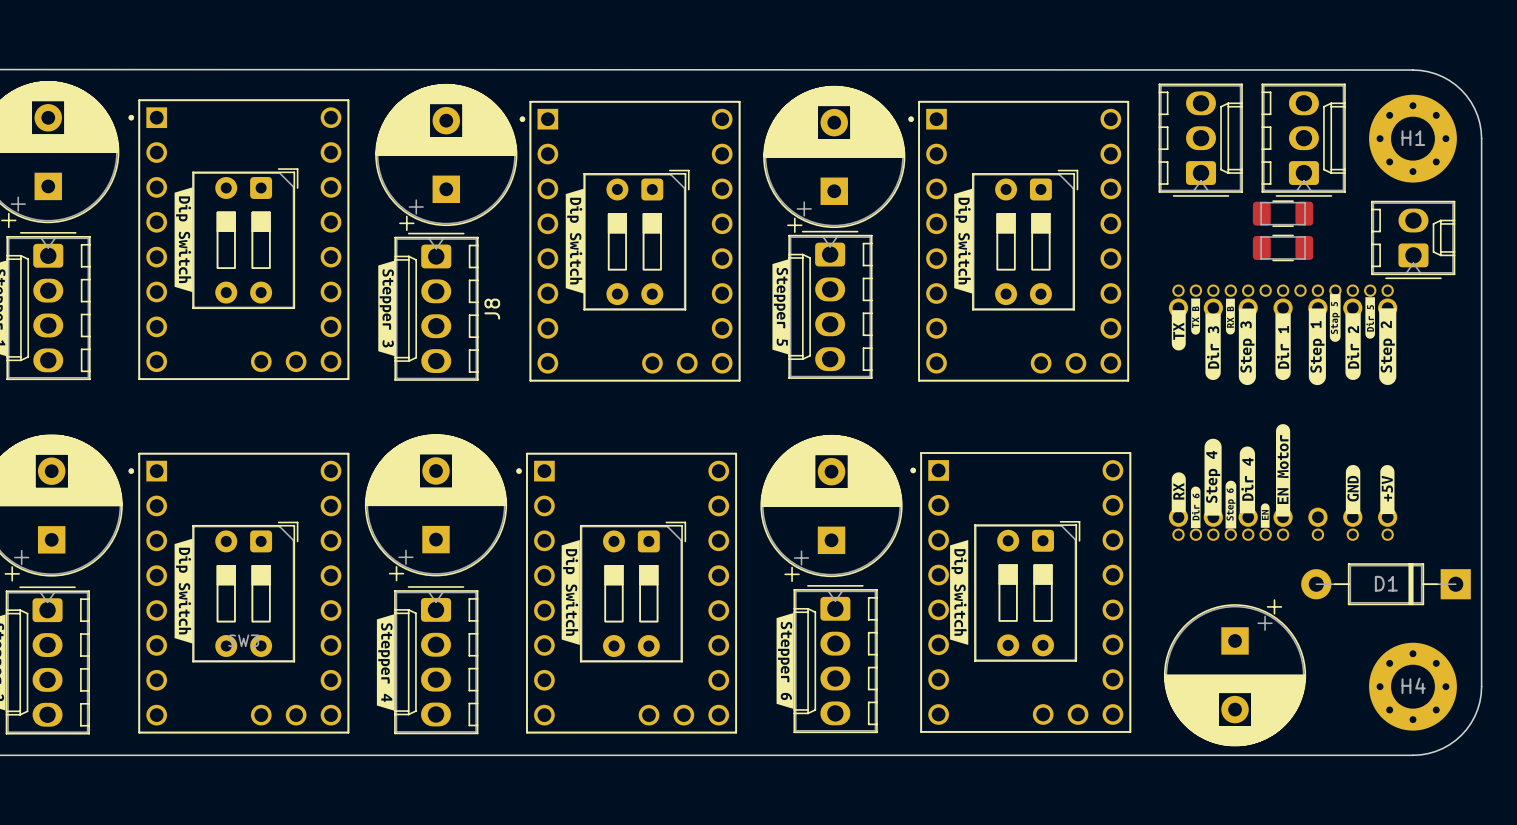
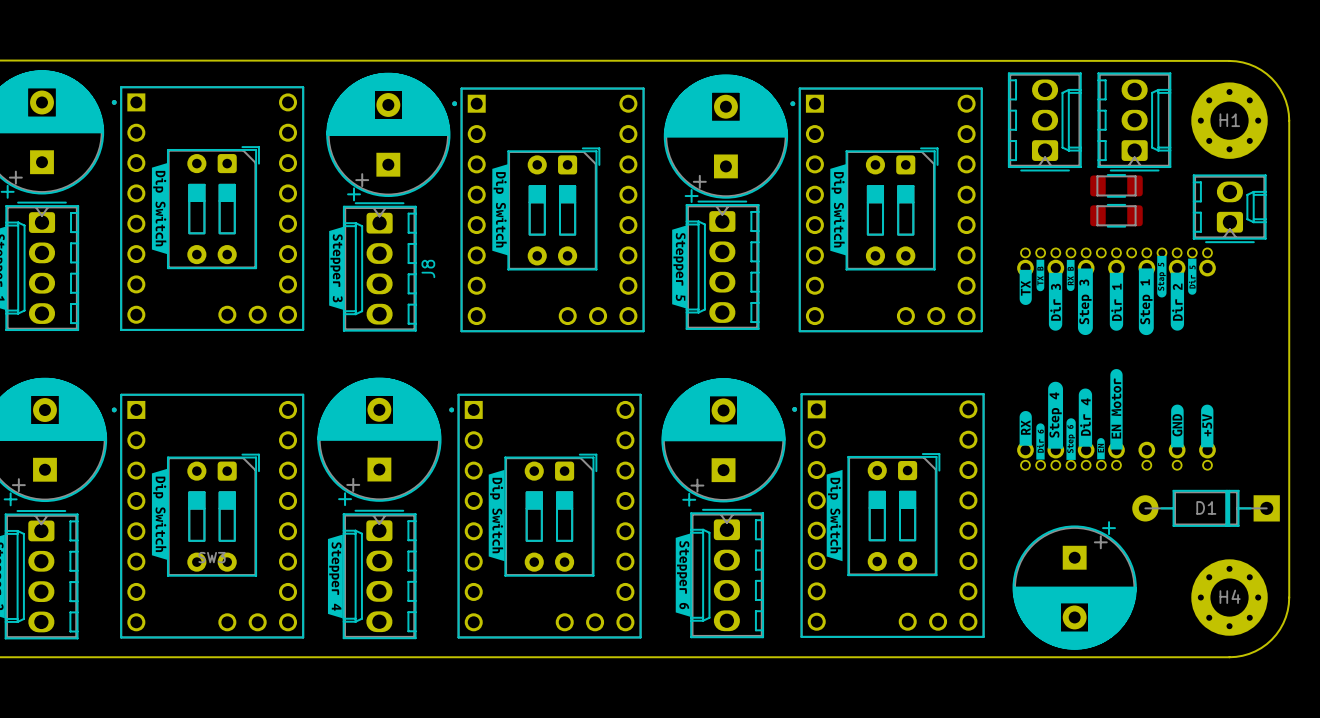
drawing: [1379, 308, 1397, 385] -> none

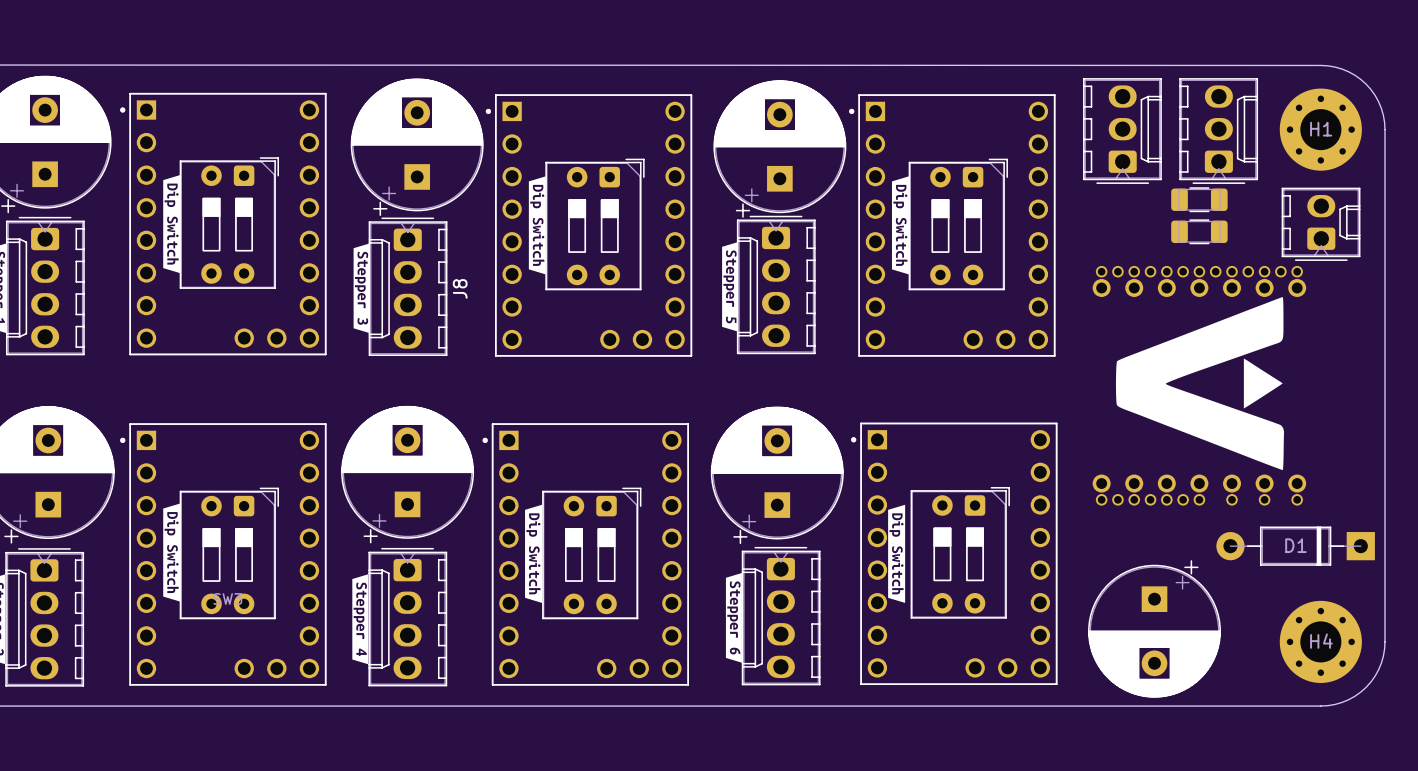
drawing: [1138, 255, 1197, 336] -> none
drawing: [1019, 259, 1093, 336] -> none
drawing: [1109, 272, 1124, 331] -> none
drawing: none -> [1115, 297, 1285, 471]
drawing: [1019, 369, 1123, 460] -> none
drawing: [1171, 404, 1184, 448] -> none
drawing: [1201, 404, 1214, 448] -> none

